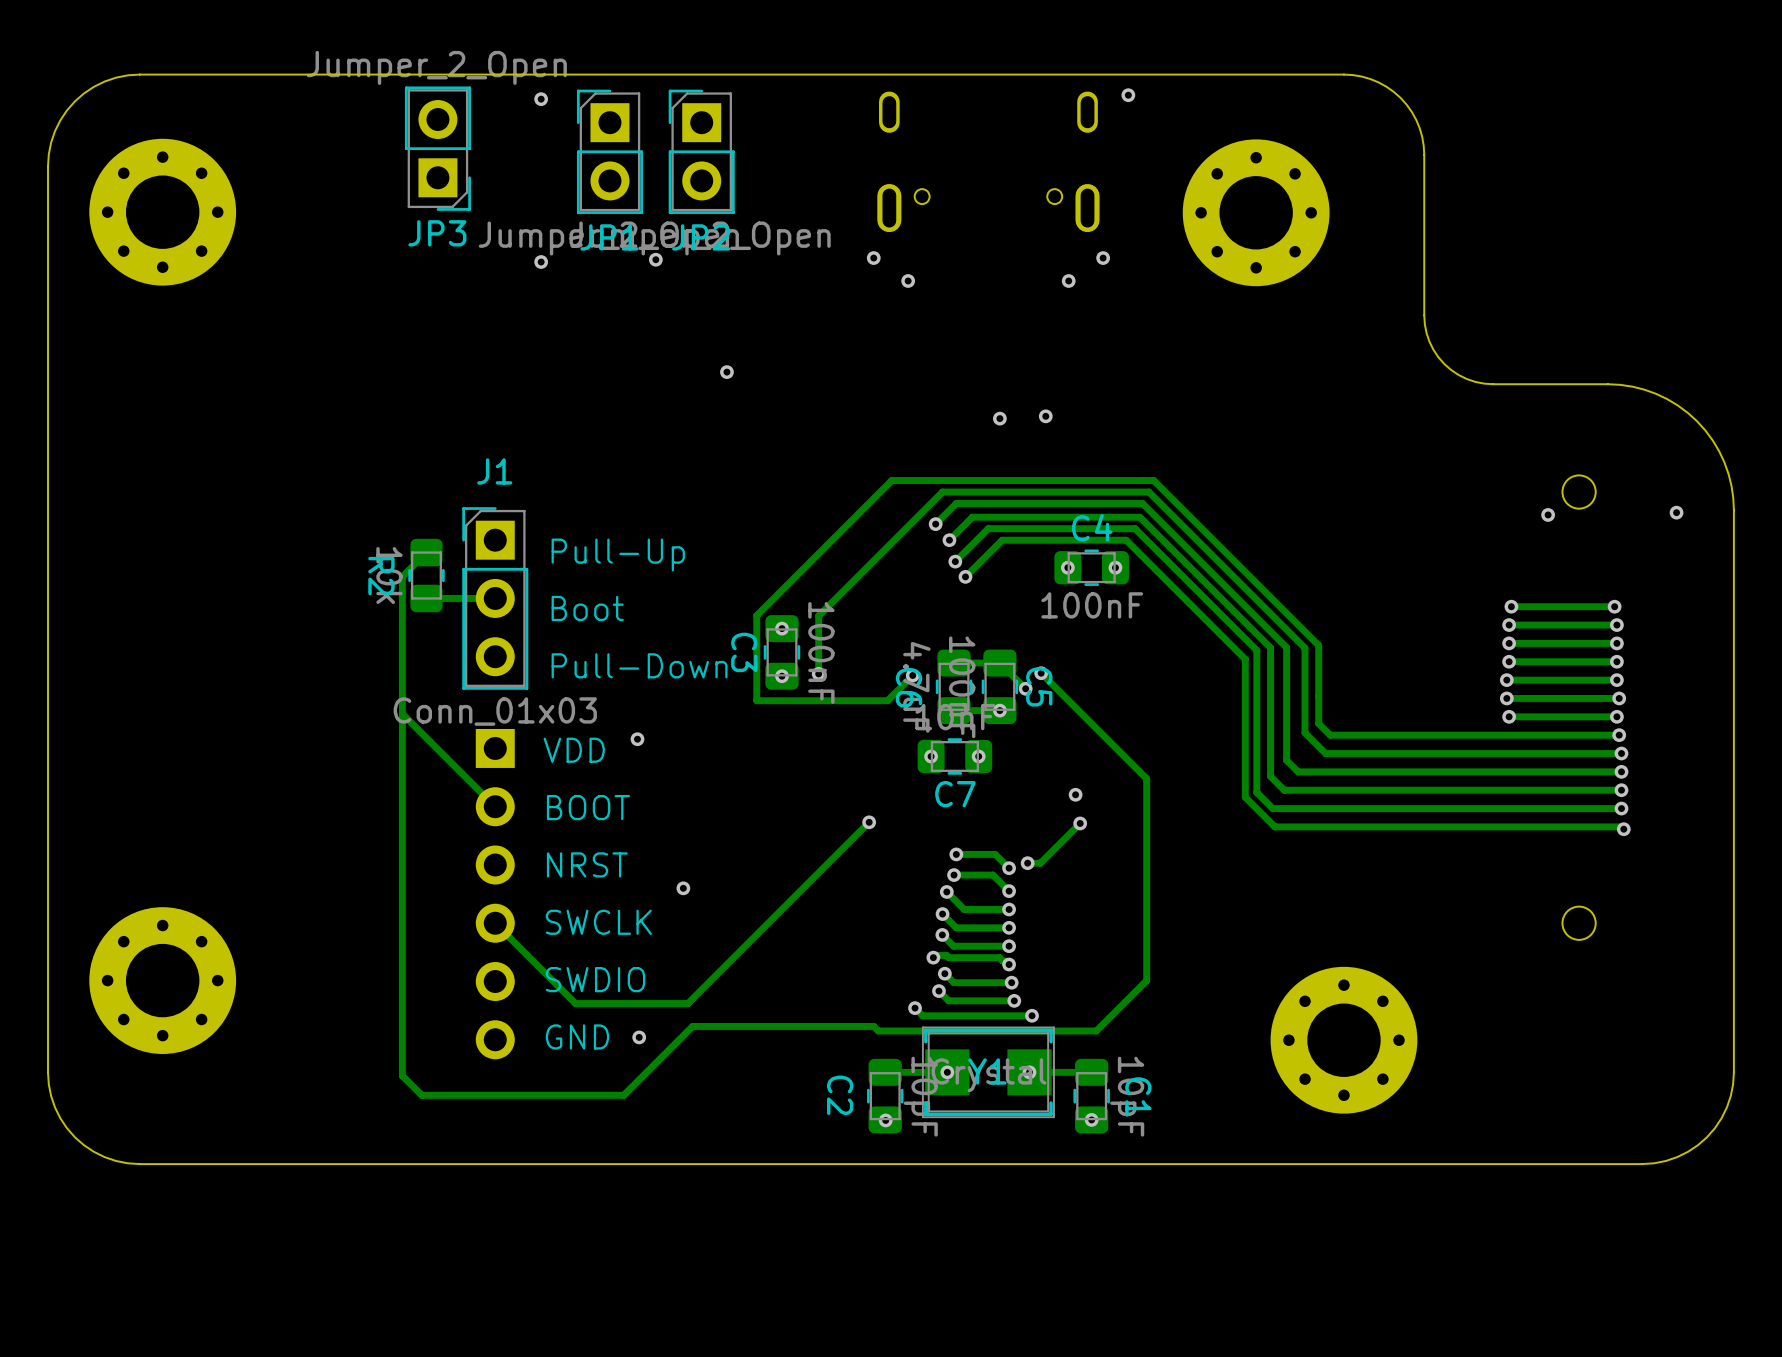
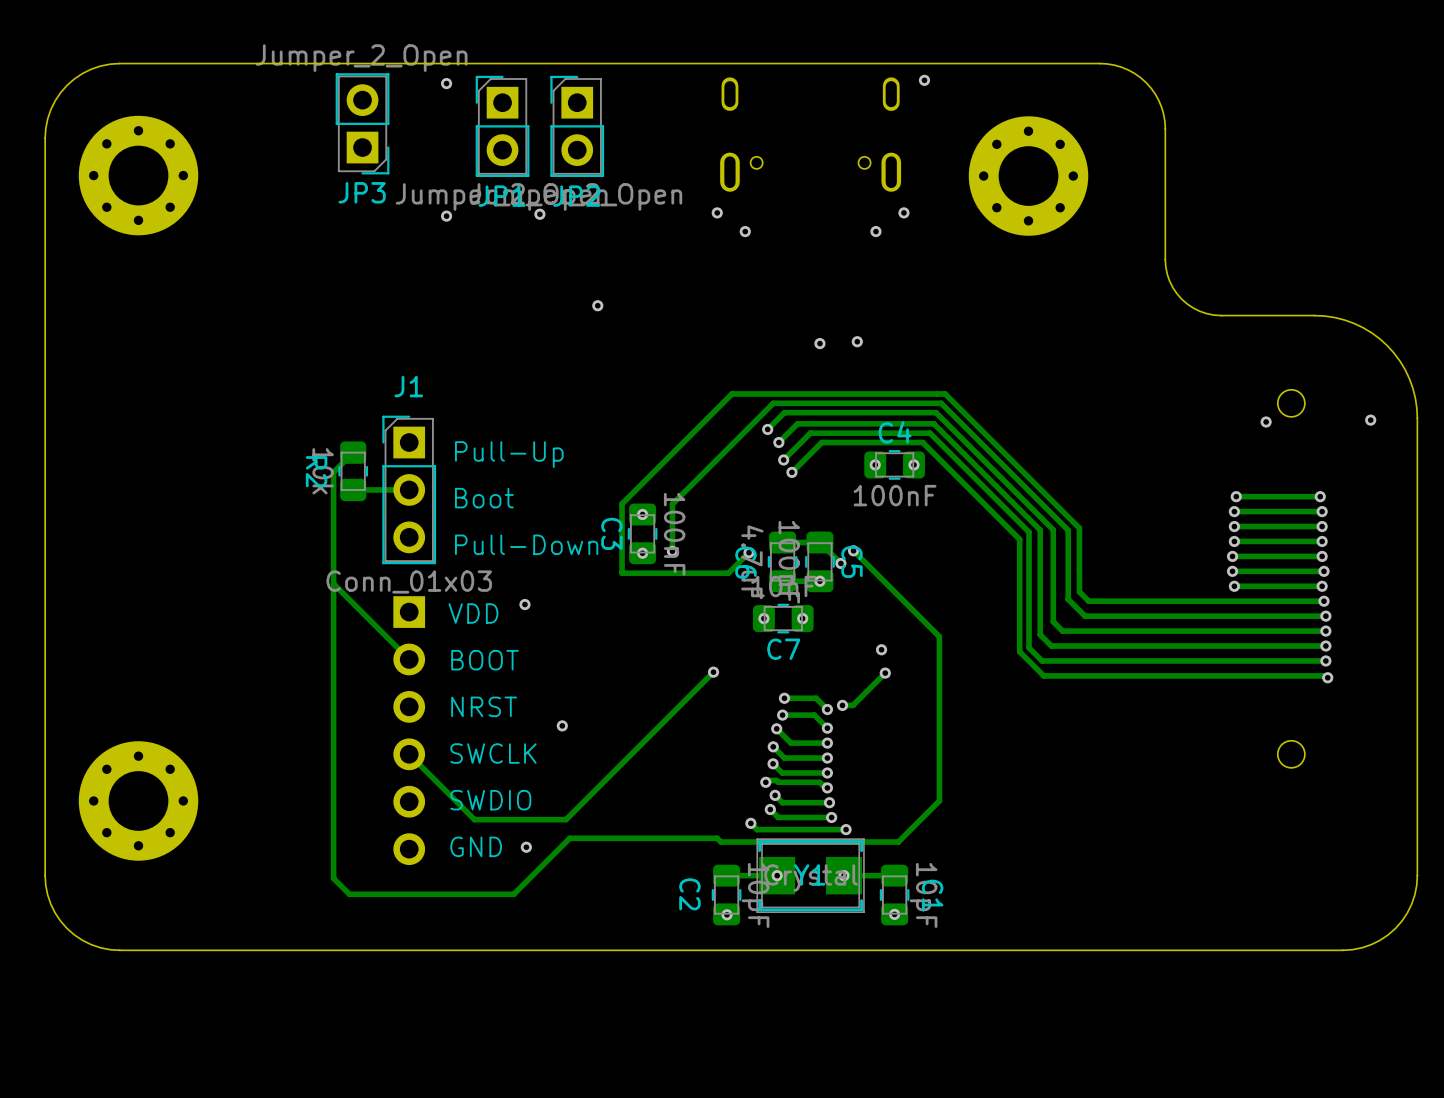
part: (1343, 1040) -> none

